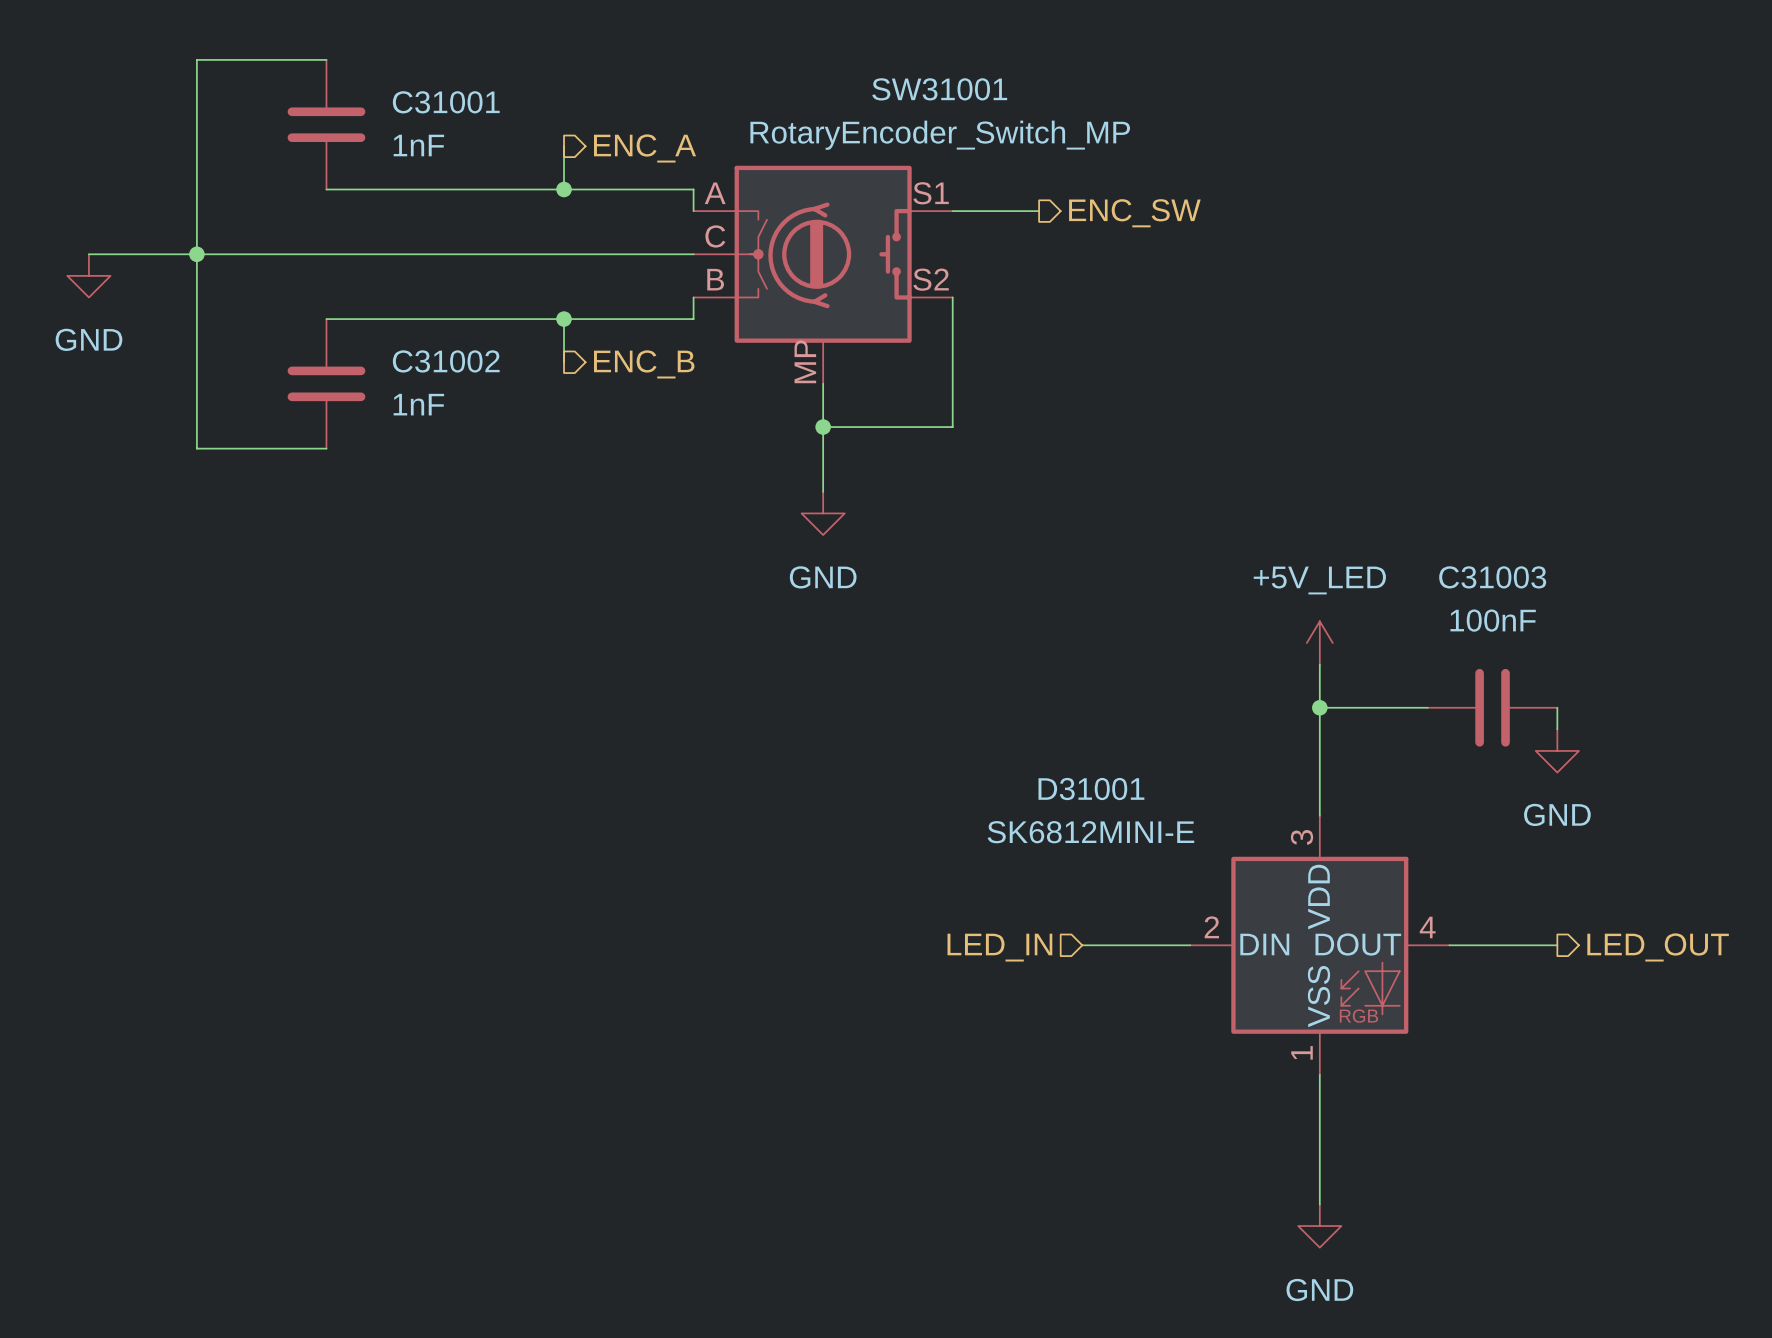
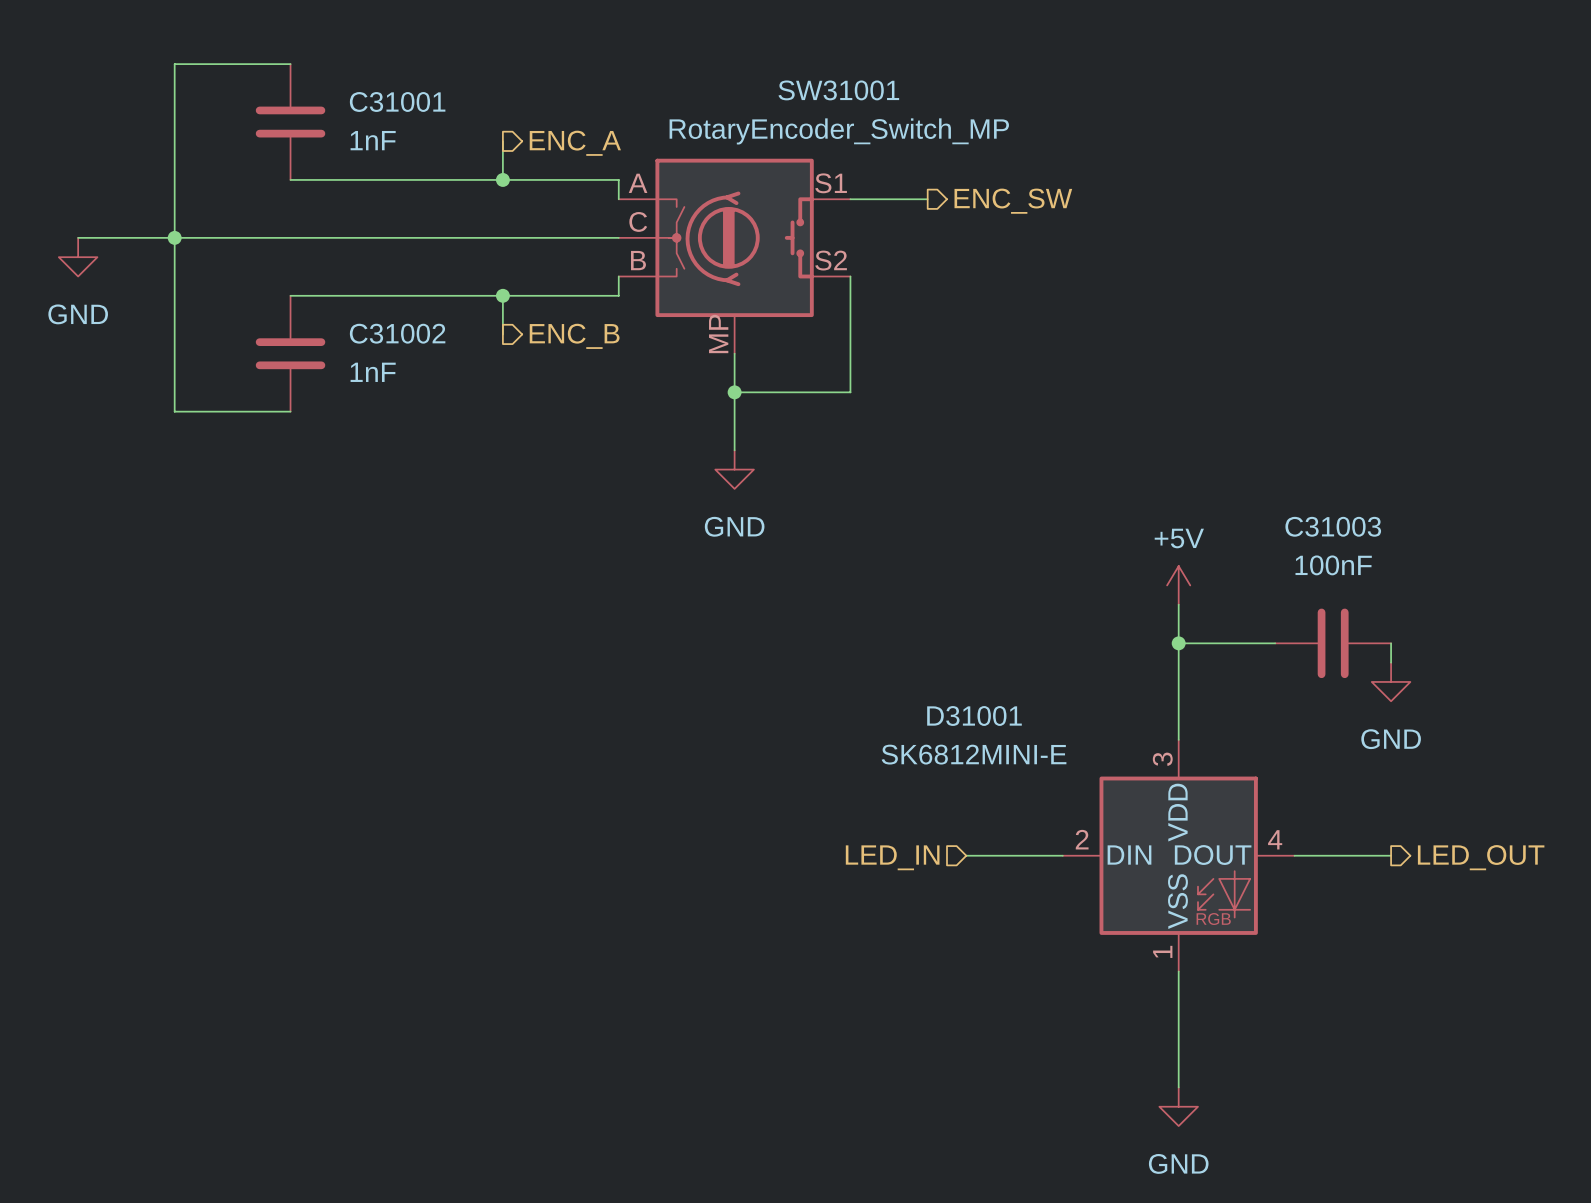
power symbol: +5V_LED (1319, 642) -> +5V (1178, 585)

